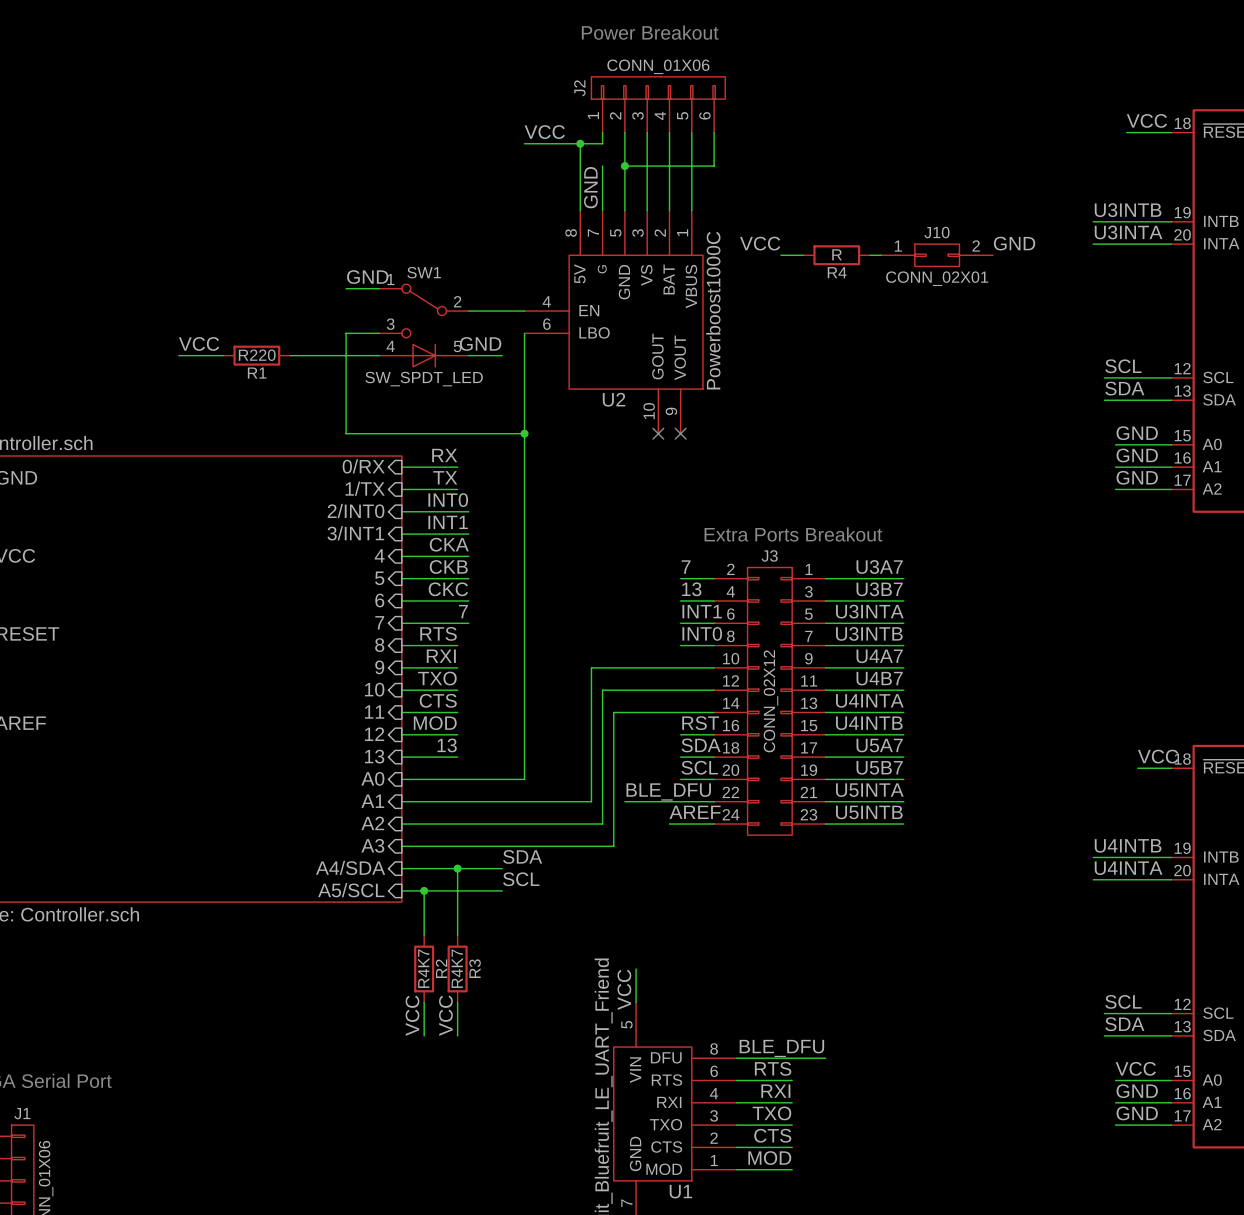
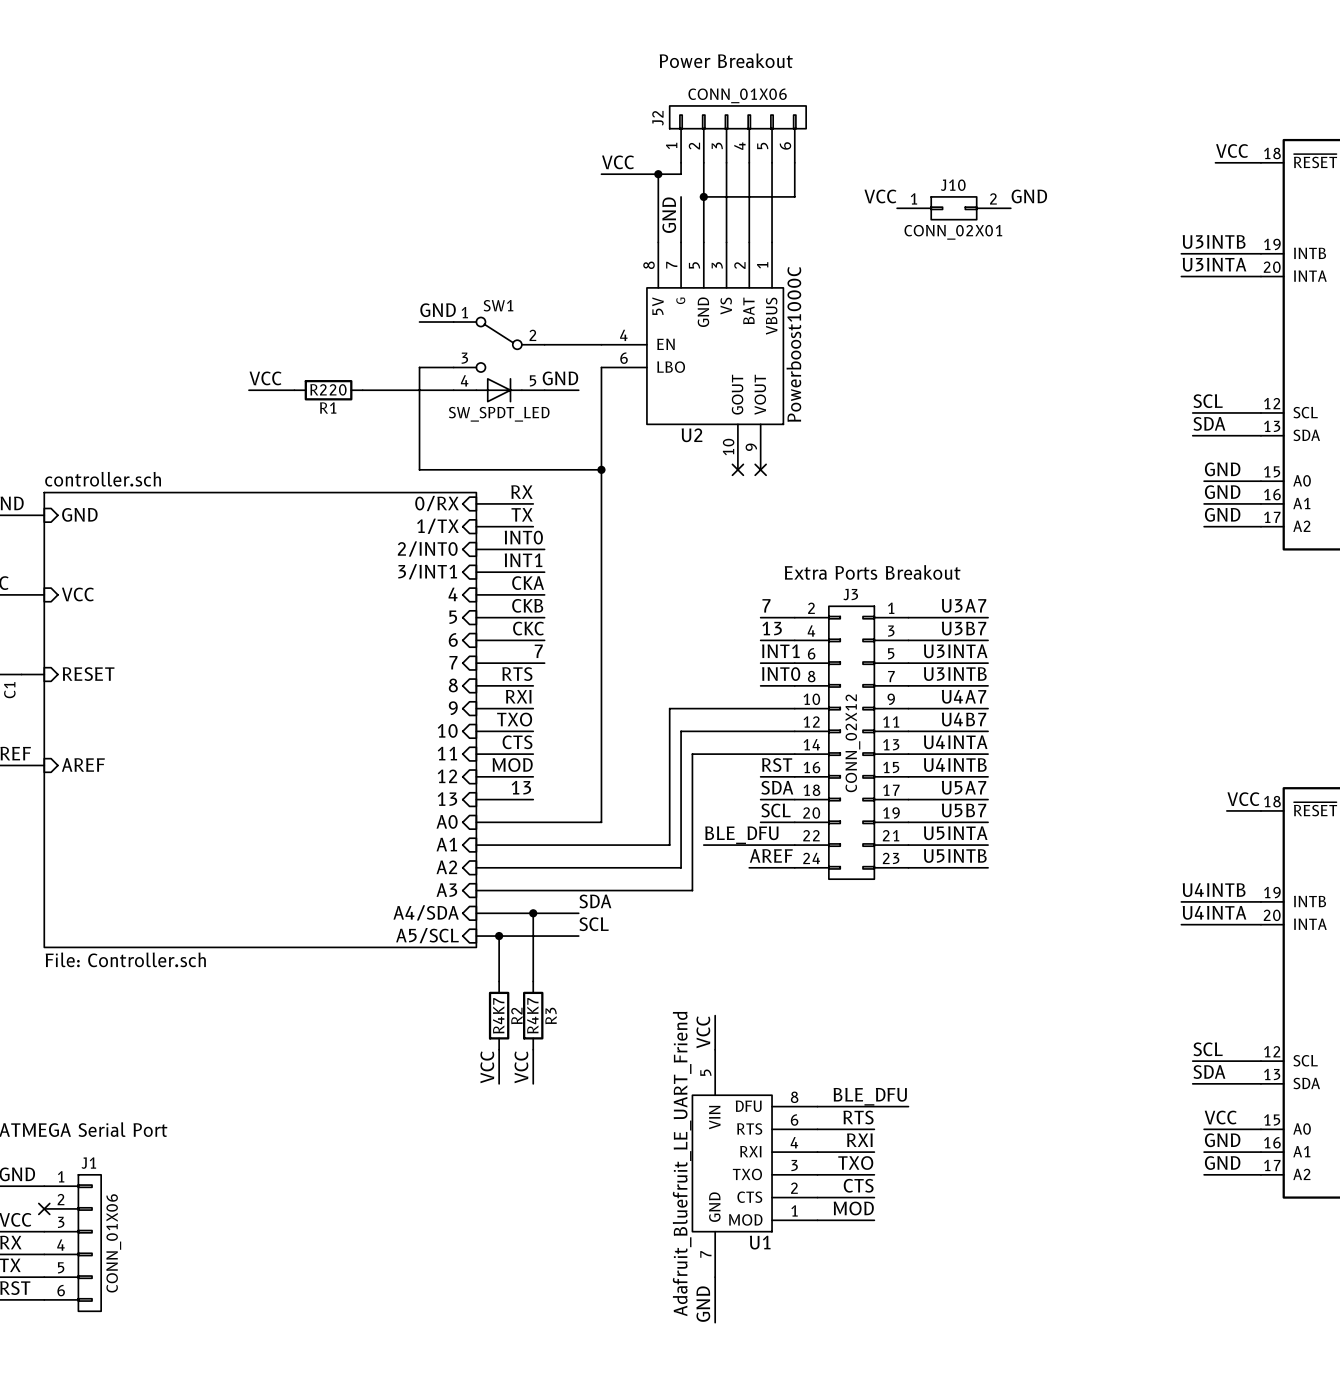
label position: VCC (760, 243) -> VCC (880, 196)
label position: GND (1014, 243) -> GND (1029, 196)
wire: (781, 255) (803, 255) -> none
R4: R (836, 255) -> none
wire: (870, 255) (881, 255) -> none
J10 position: (937, 255) -> (953, 208)

